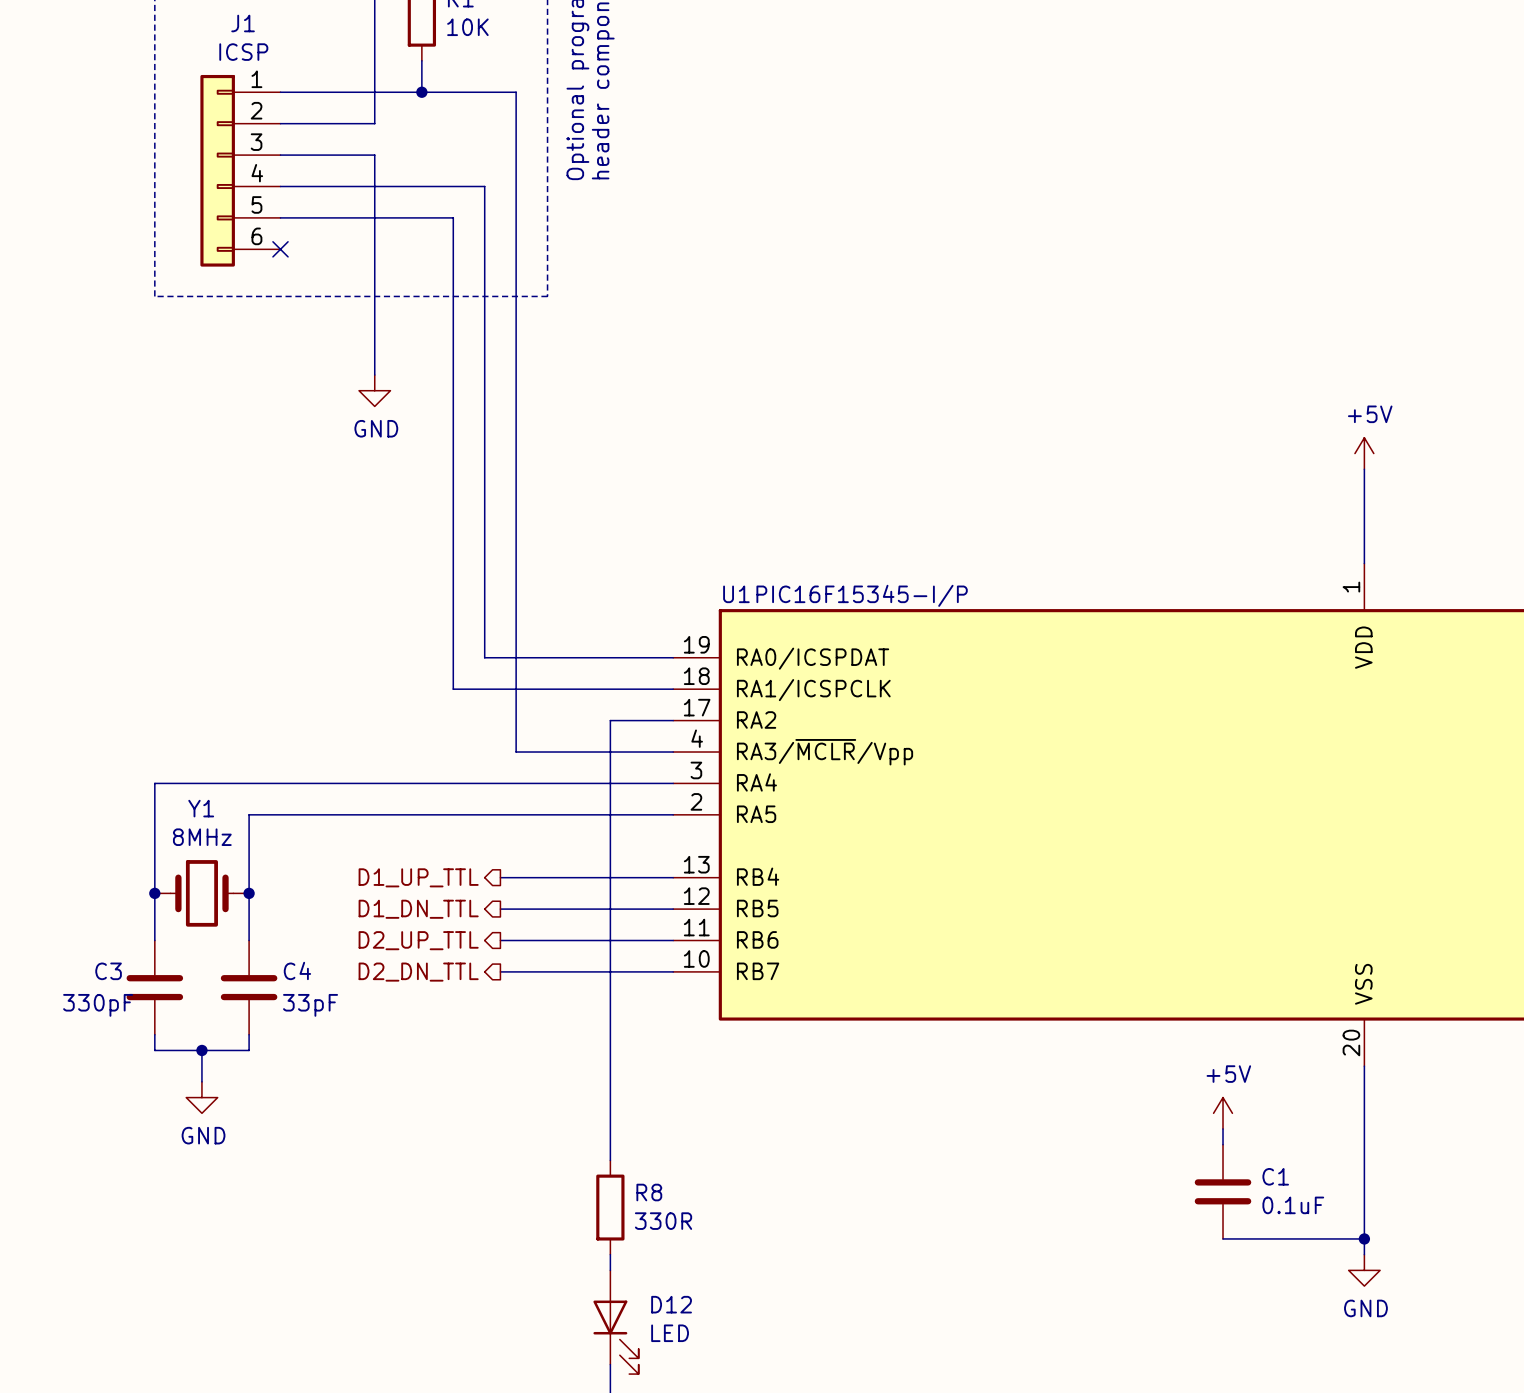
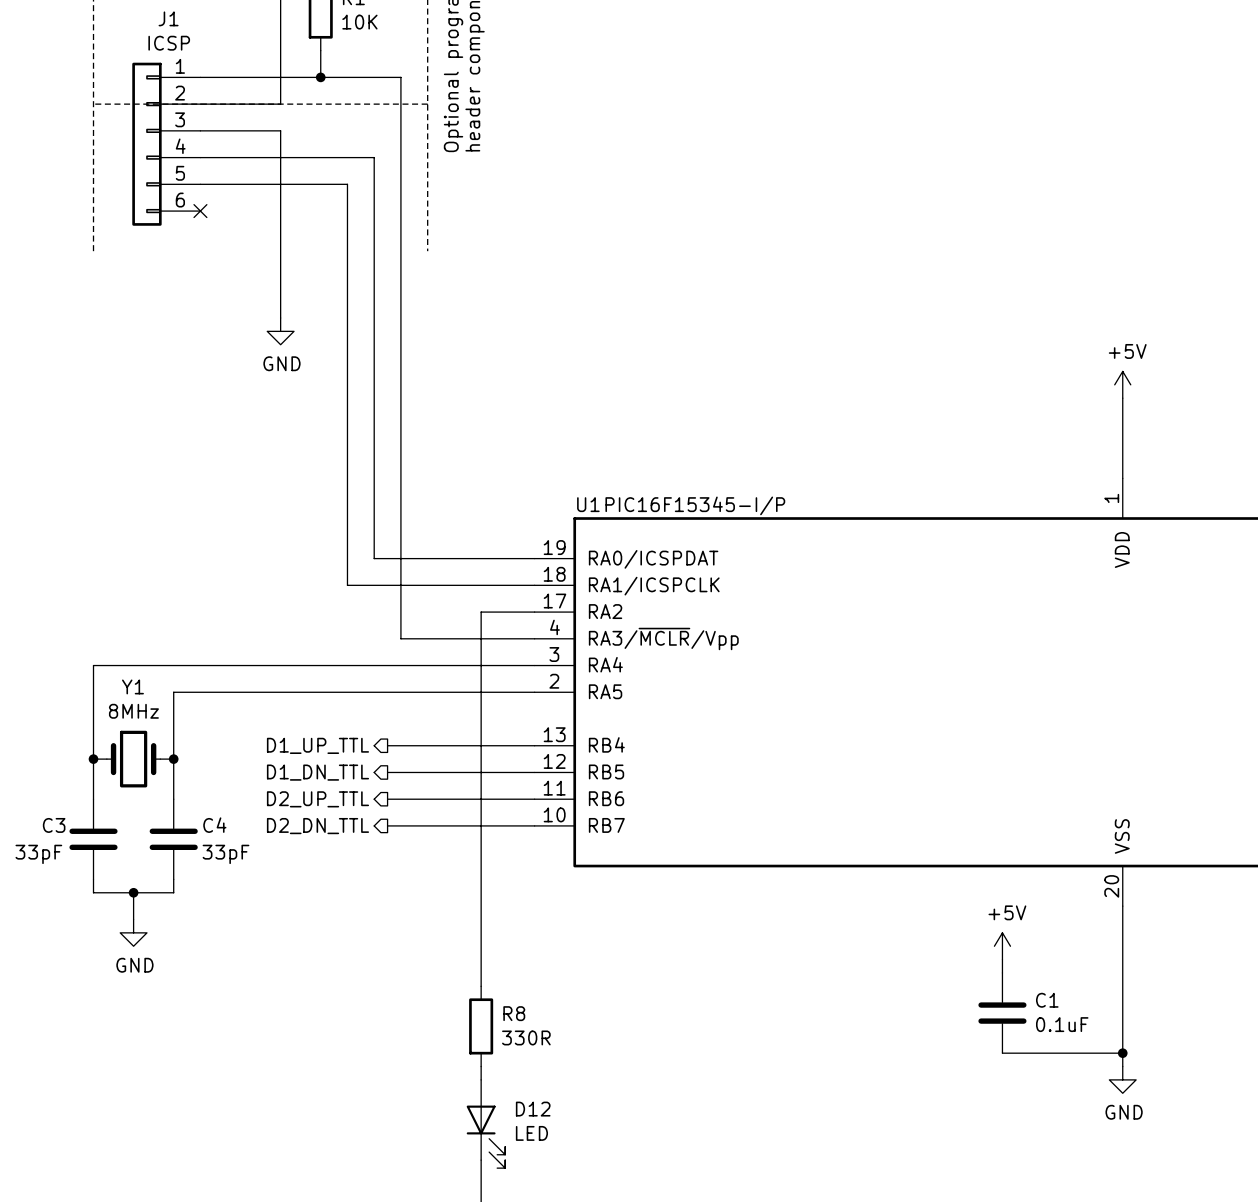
line: (154, 296) (547, 296) -> (93, 104) (427, 104)
C3 value: 330pF (98, 1005) -> 33pF (38, 854)

